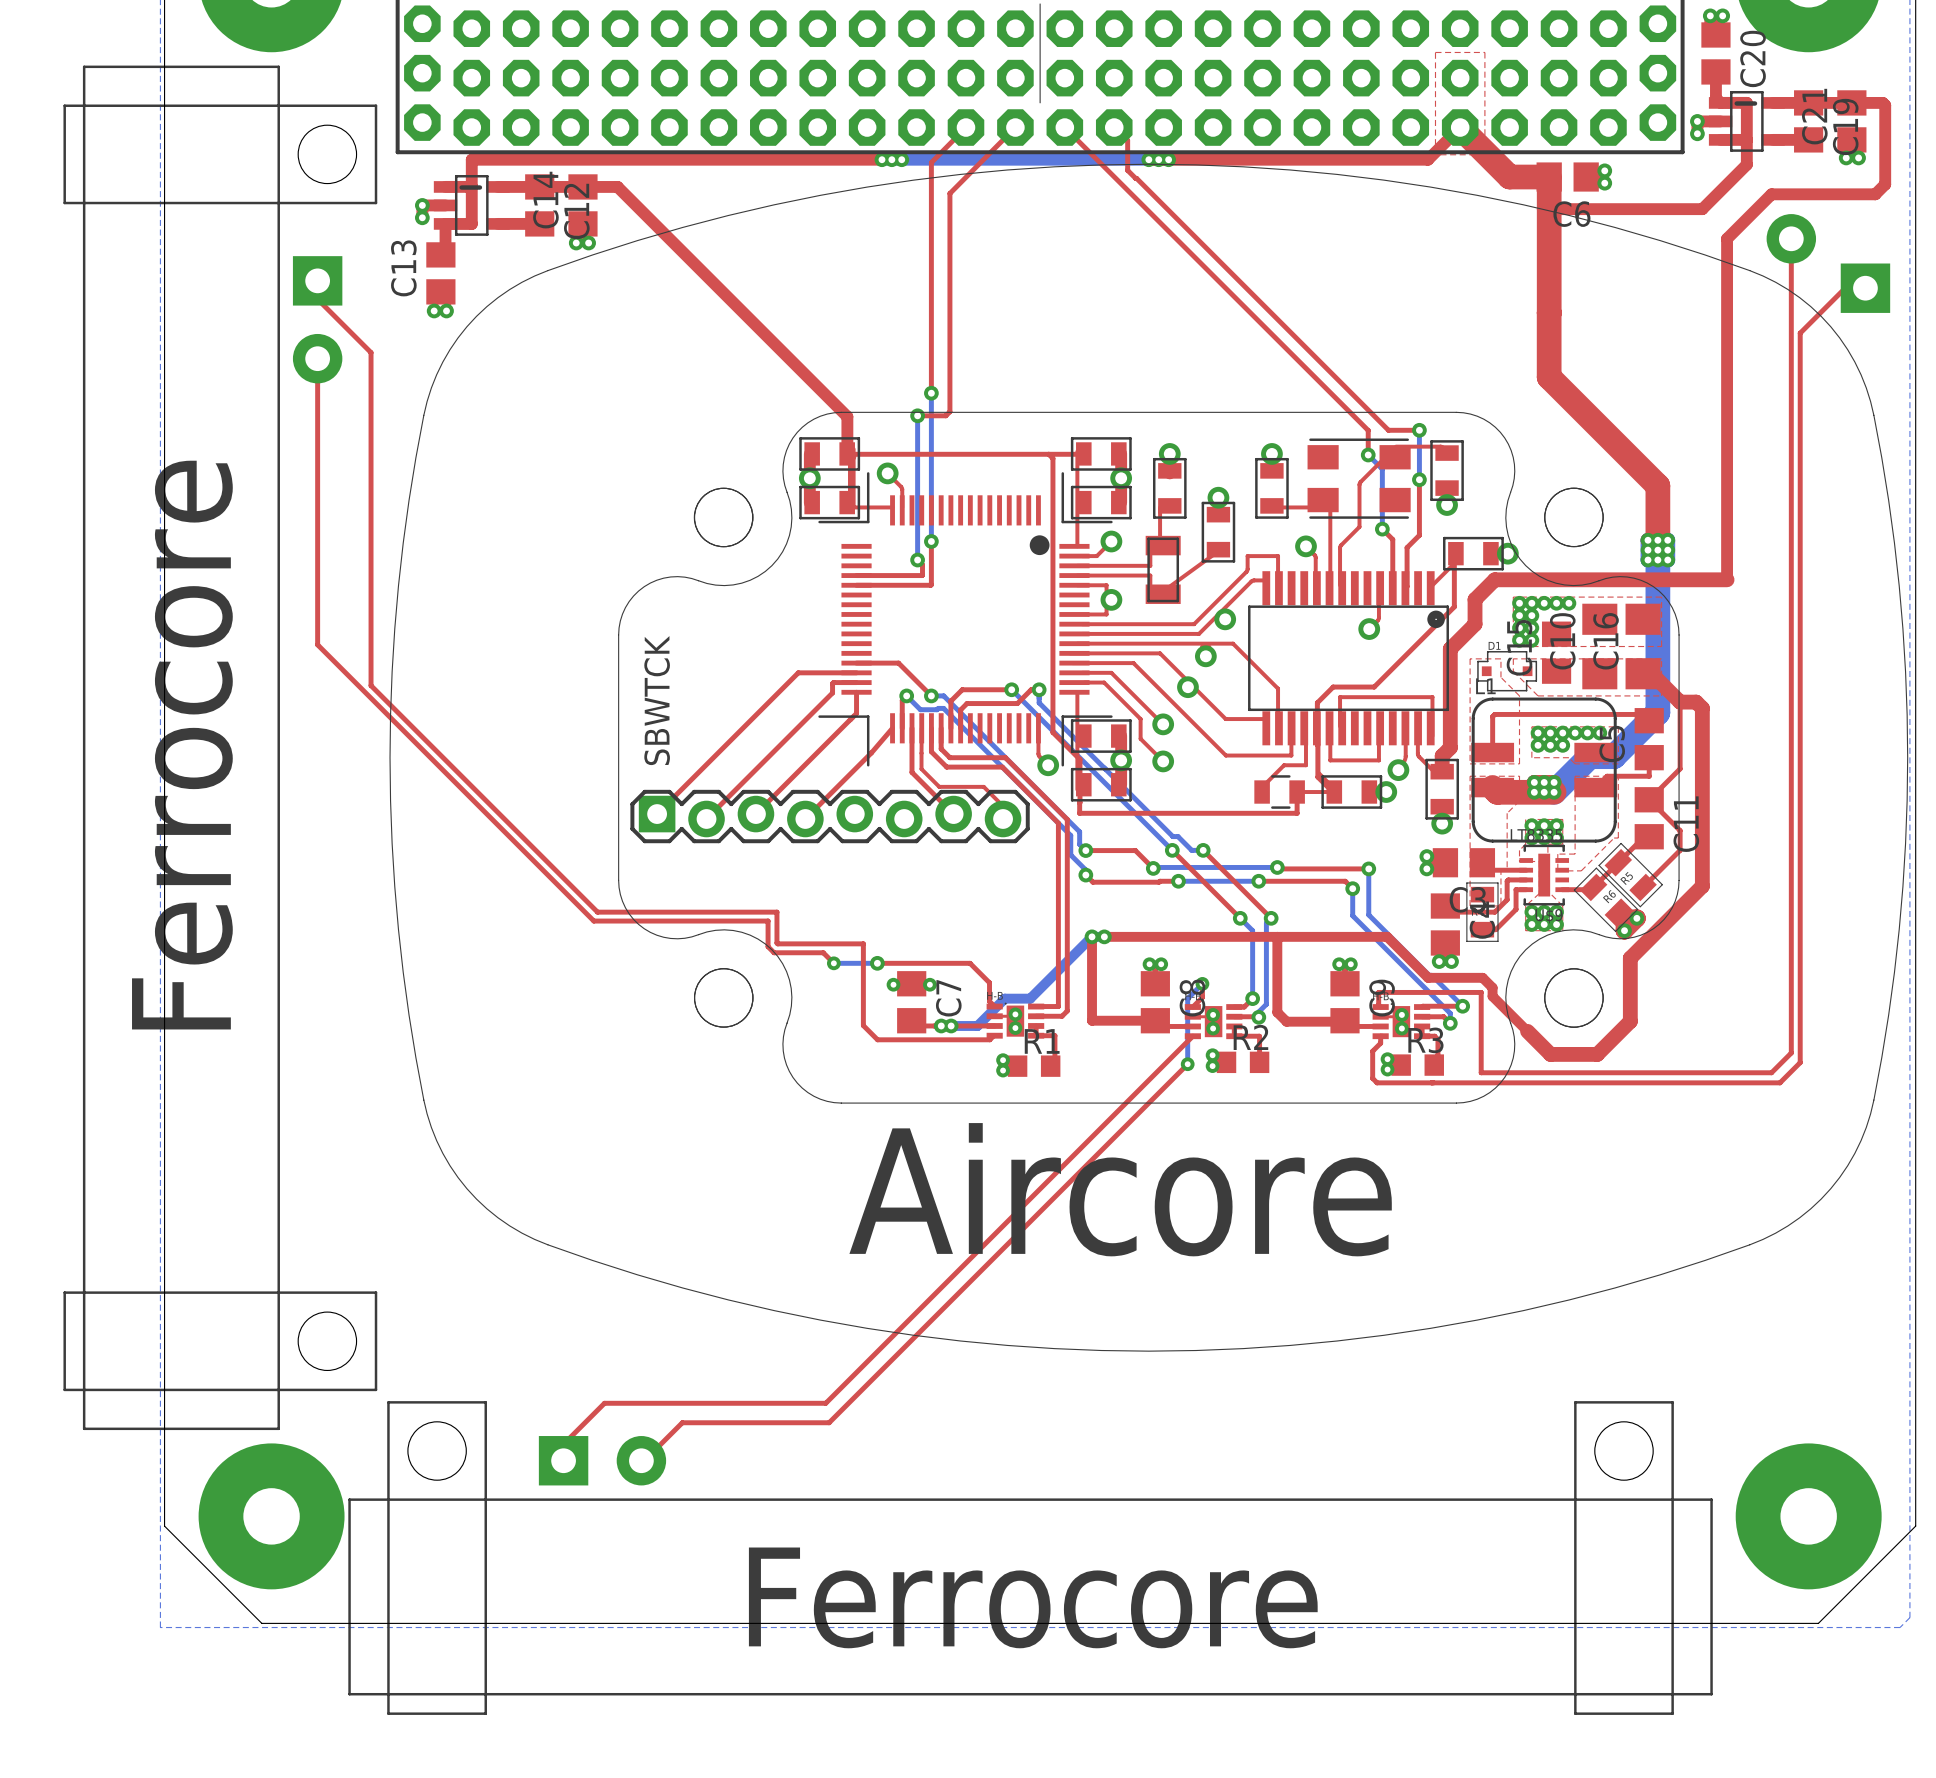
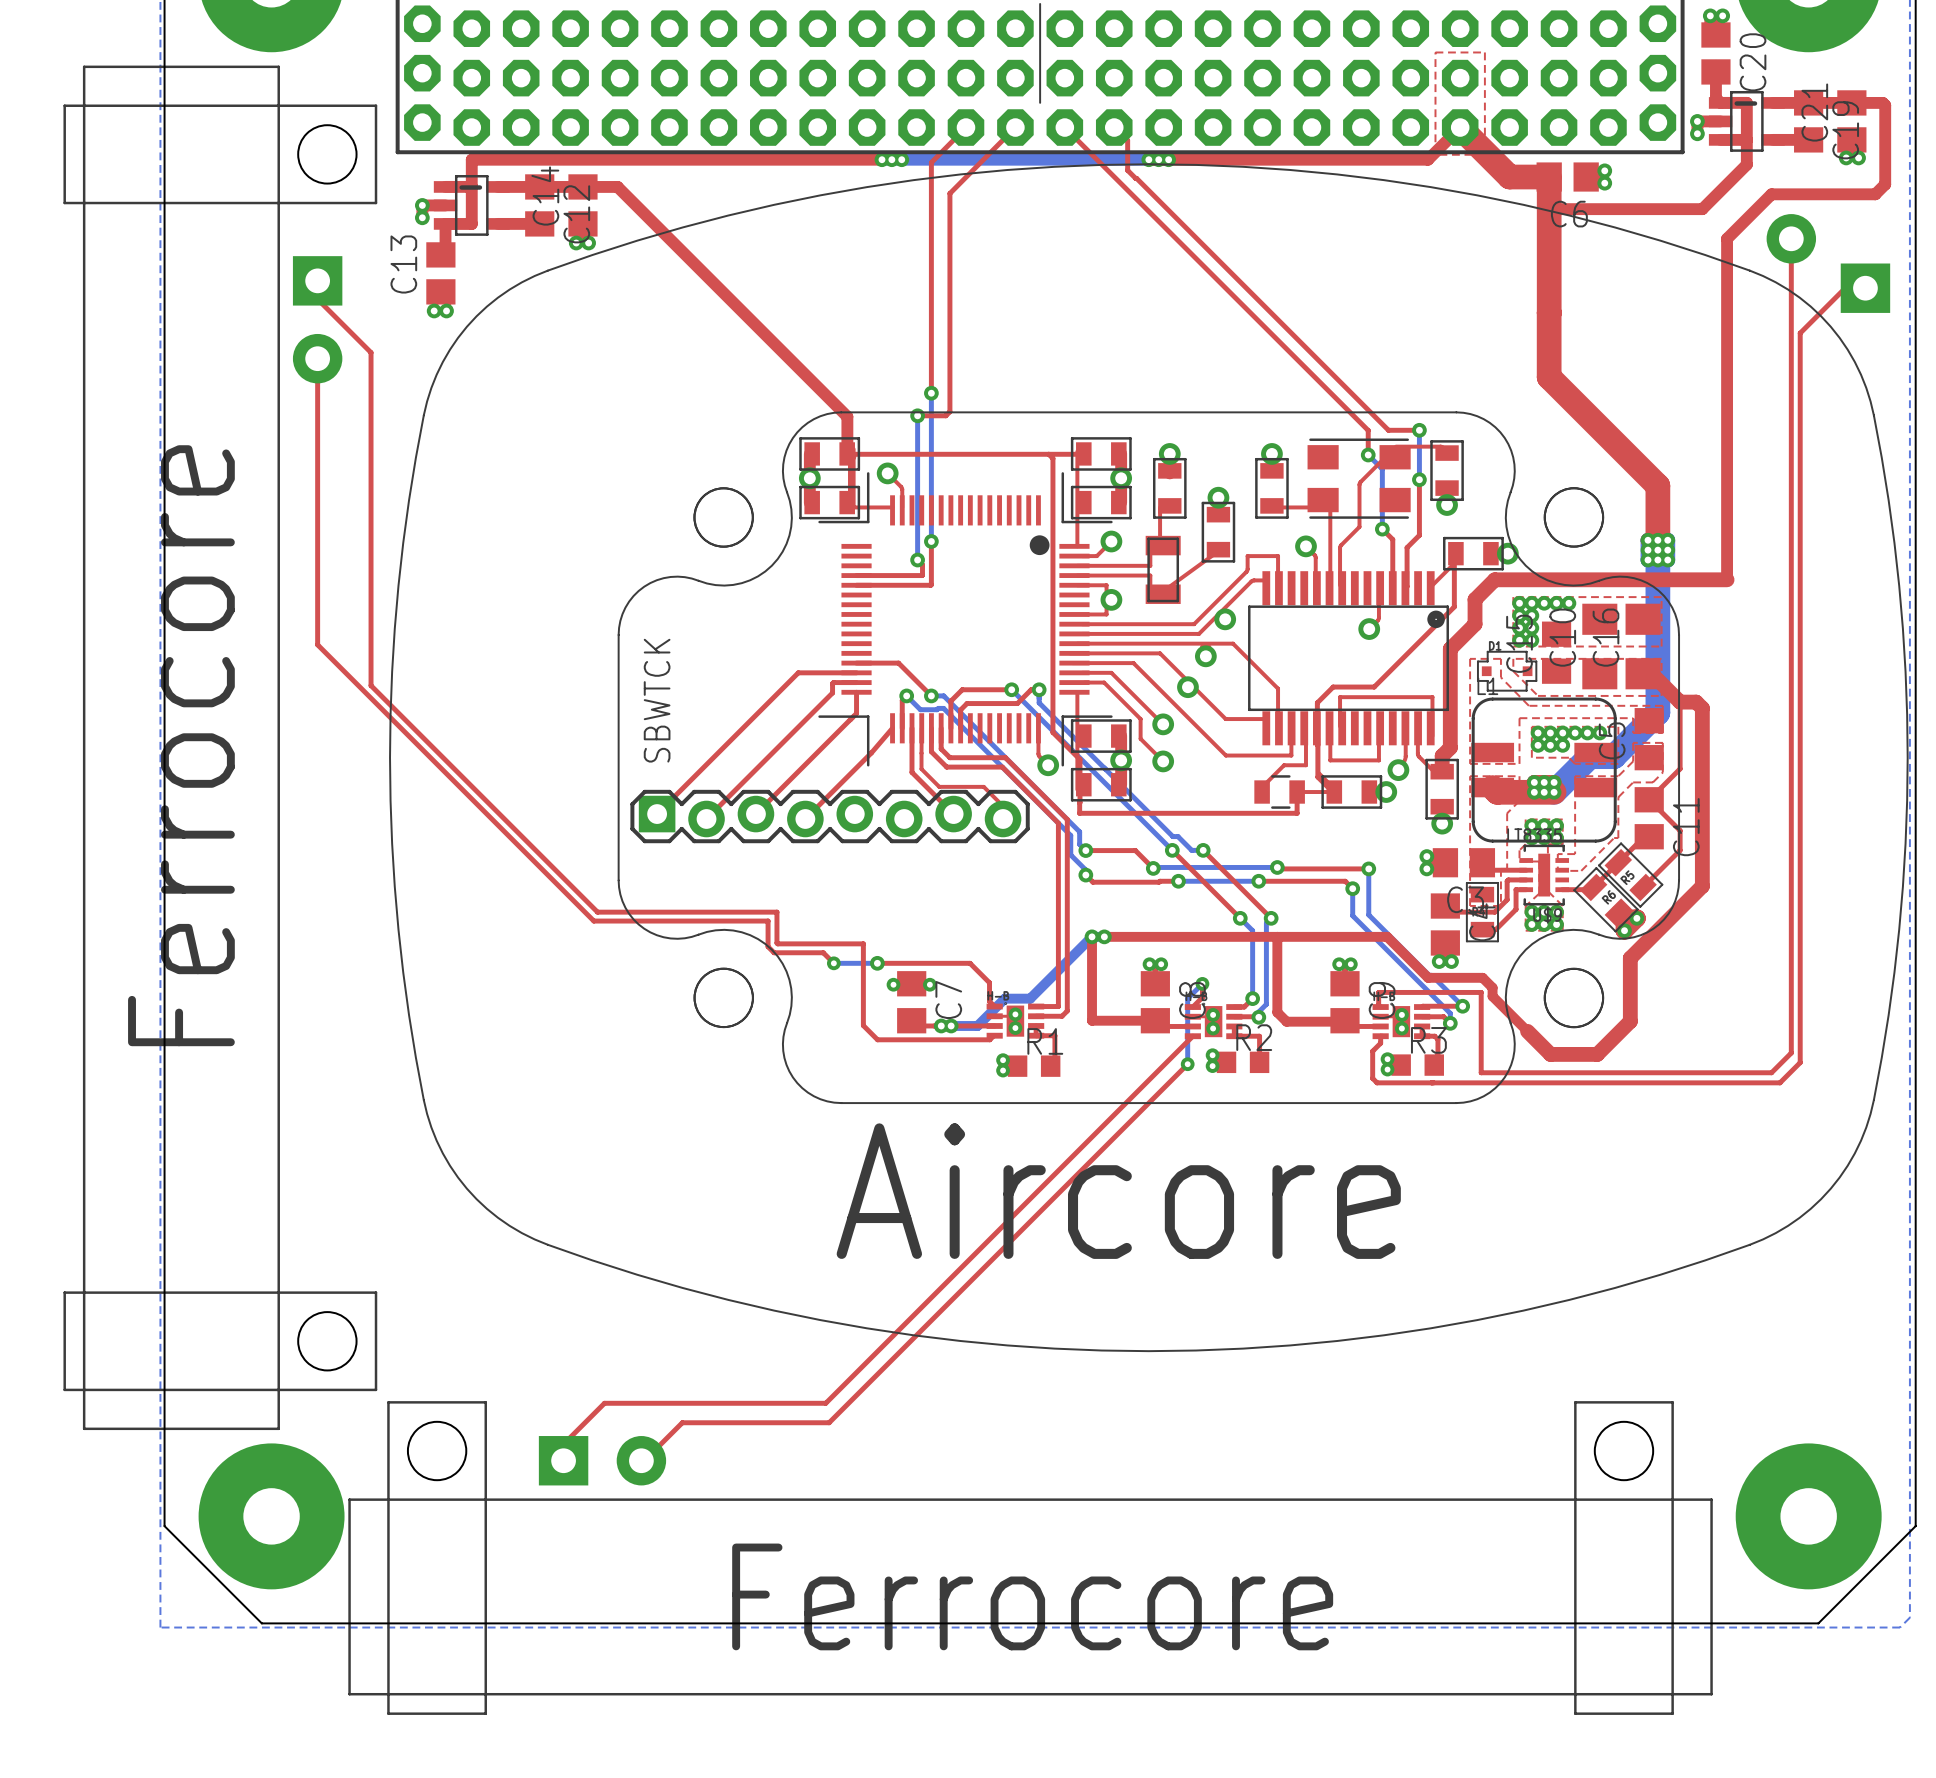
top zone outline: (1500, 677) (1519, 695) (1519, 718) -> (1500, 677) (1528, 705) (1662, 705) (1662, 733) (1633, 733) (1633, 718) (1519, 718)
top track: (1649, 720) (1643, 714) (1494, 714) (1492, 716) (1492, 752) -> none
top track: (1649, 757) (1649, 776) (1607, 776) (1595, 787) -> none
top zone outline: (1618, 776) (1618, 797) -> (1618, 776) (1633, 761) (1633, 742) (1662, 742) (1662, 772) (1652, 782) (1633, 782) (1618, 797)

